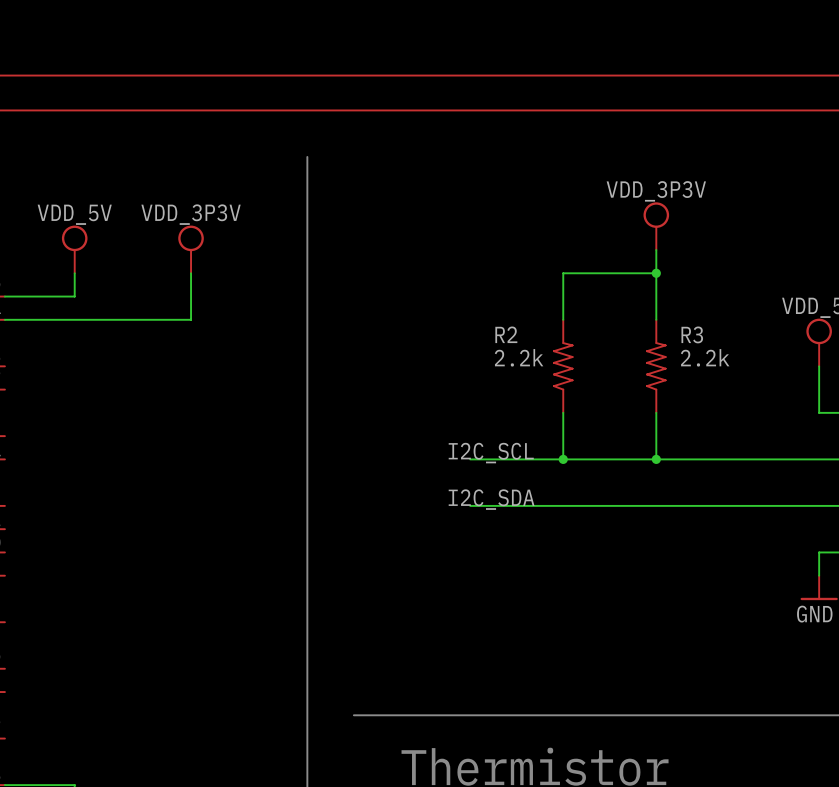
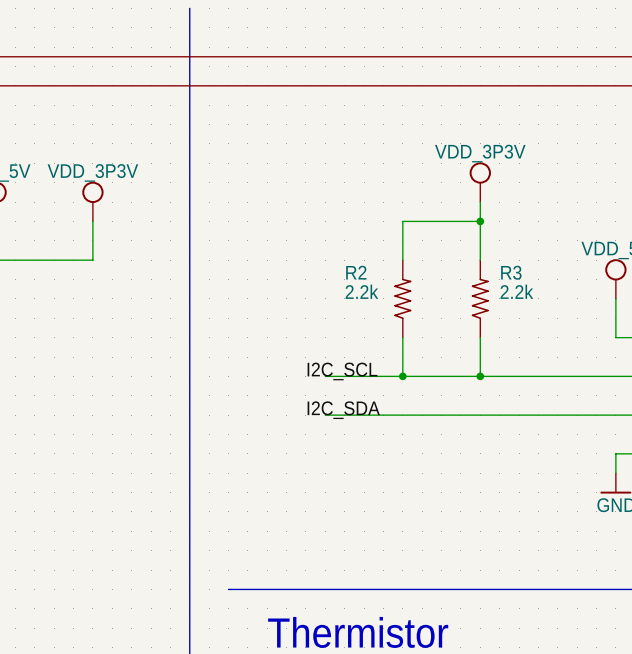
line: none -> (189, 8) (189, 124)

